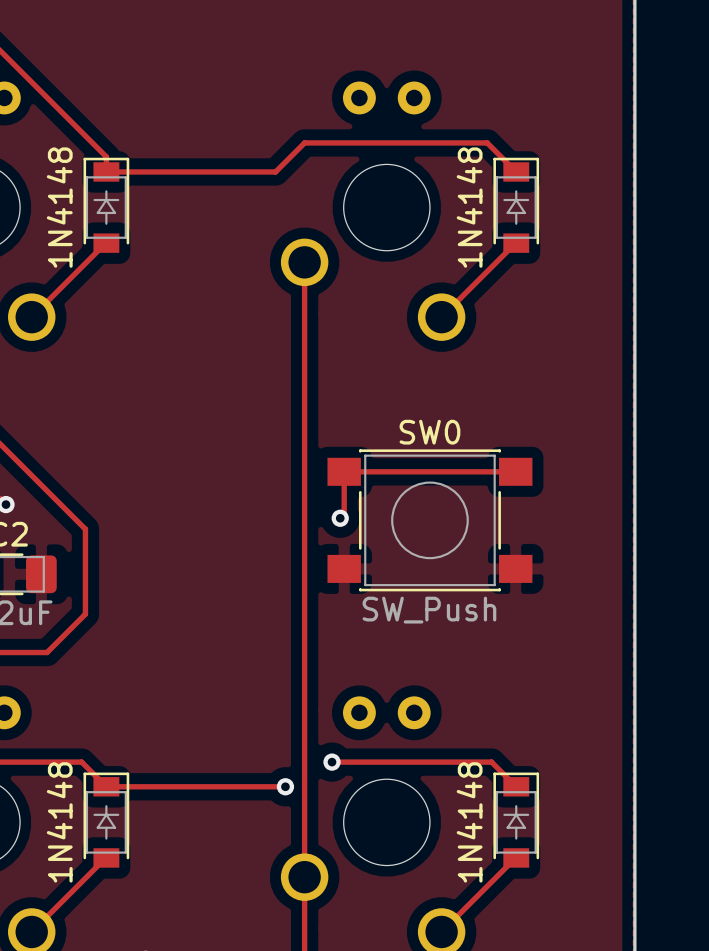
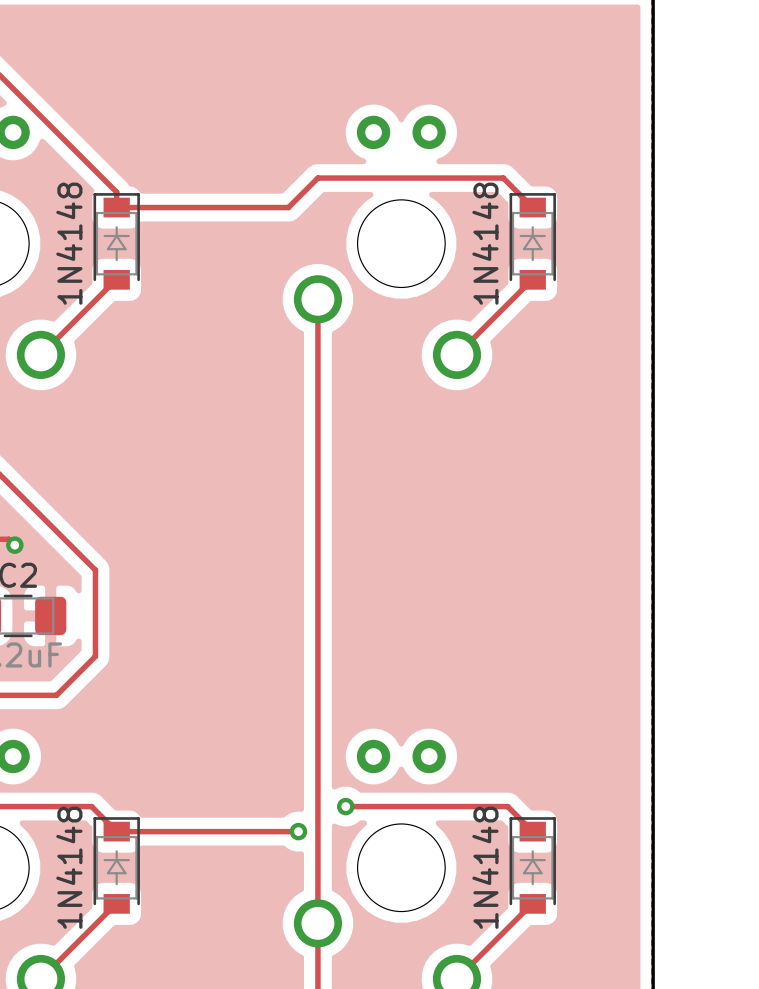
track: (515, 471) (344, 471) (344, 514) (340, 518) -> none
via: (340, 518) -> none
SW0: SW_Push (429, 520) -> none

